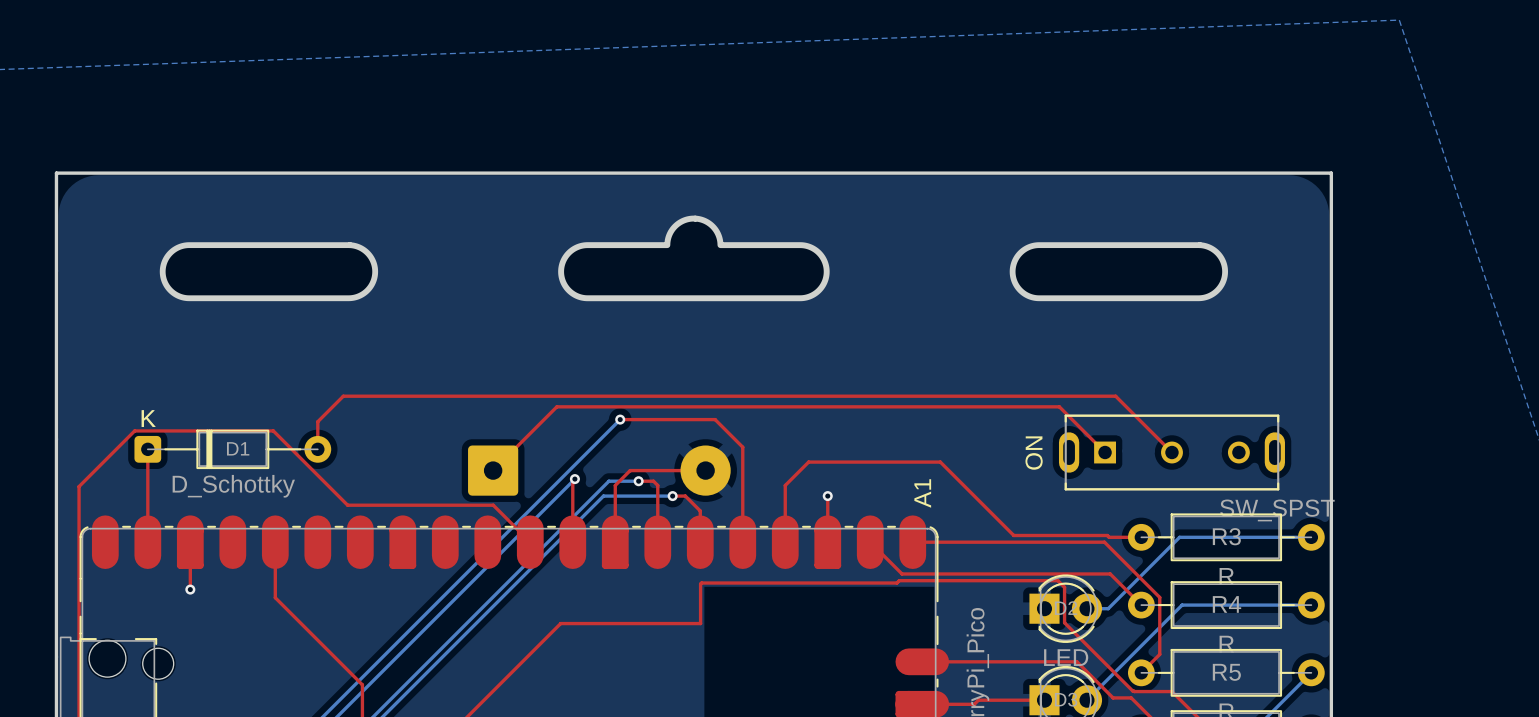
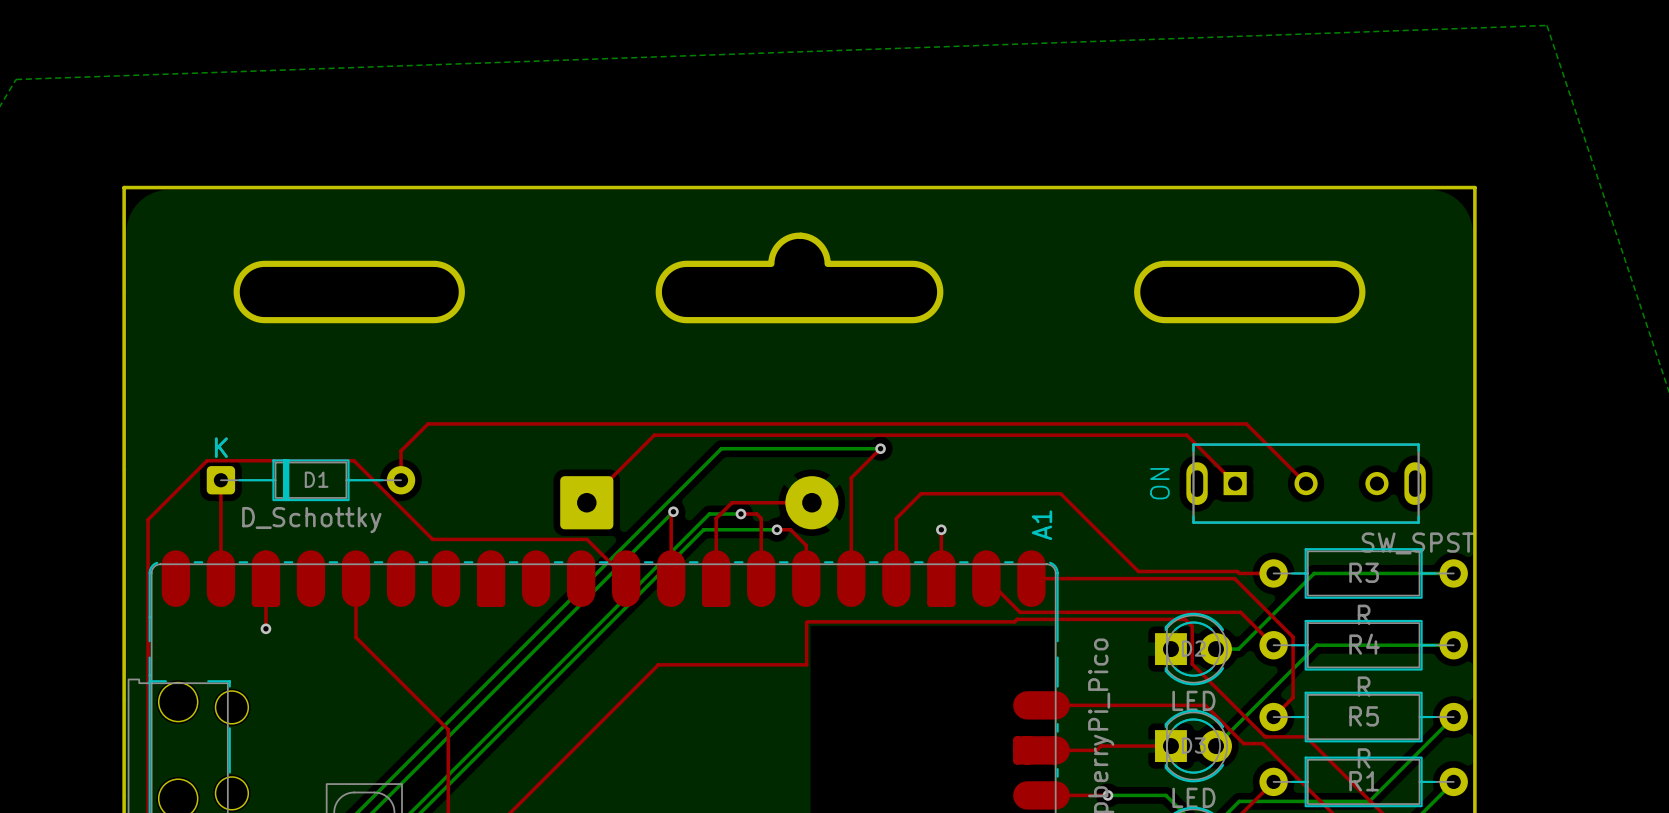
top track: (620, 419) (715, 419) (742, 447) -> (880, 448) (851, 477)
bottom track: none -> (721, 448) (880, 448)
via: (620, 419) -> none
via: none -> (880, 448)

